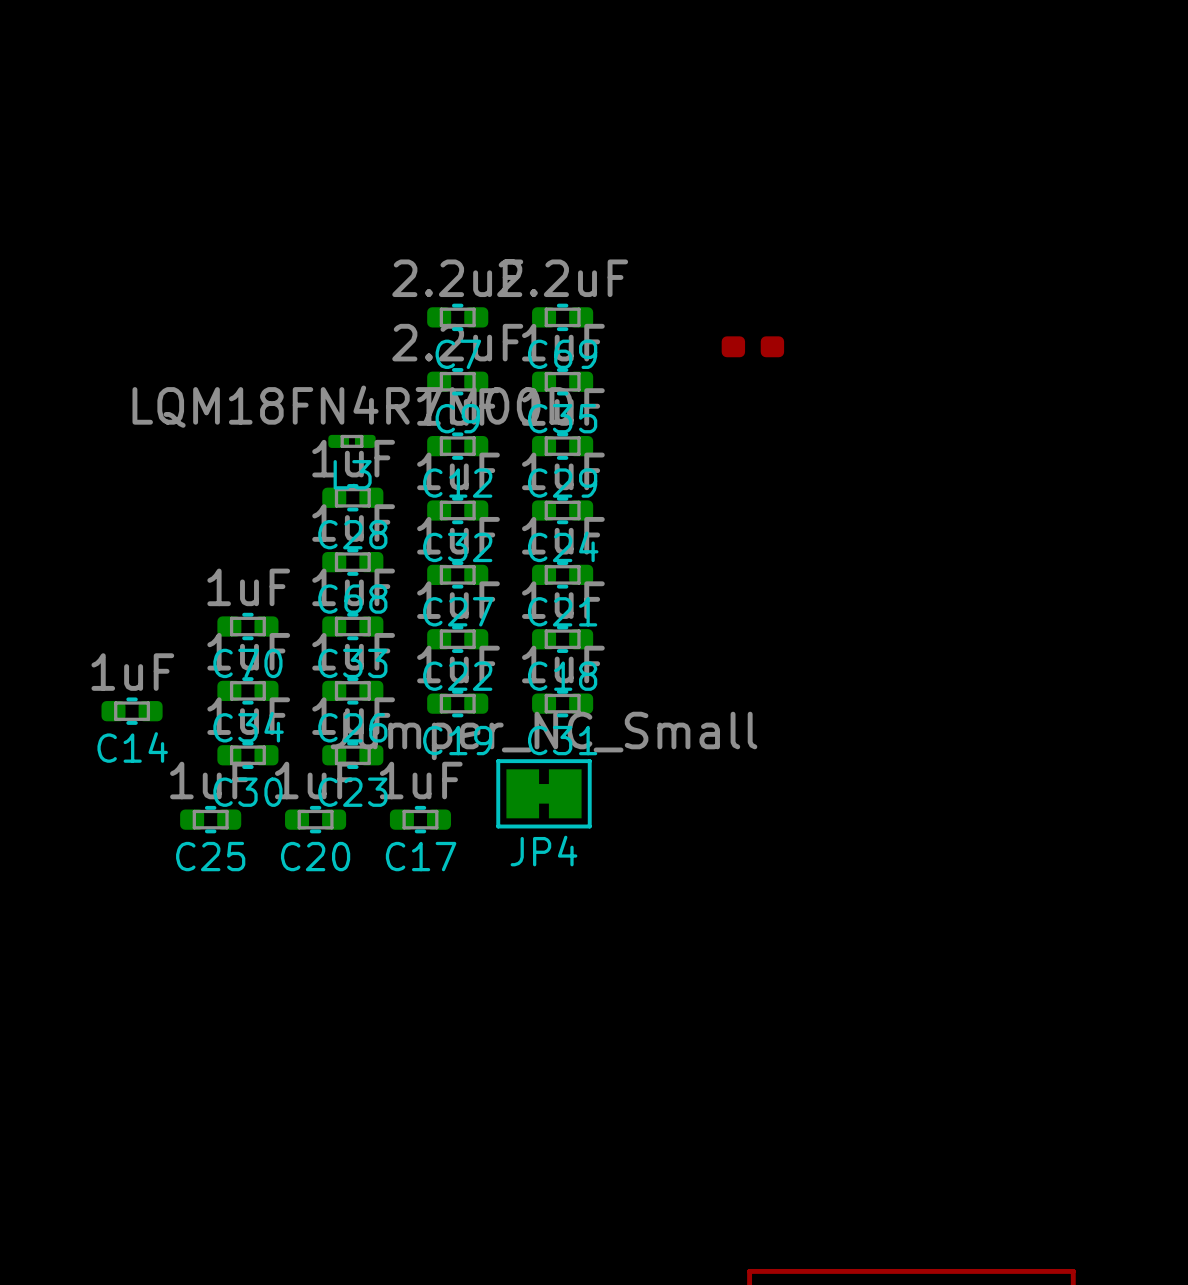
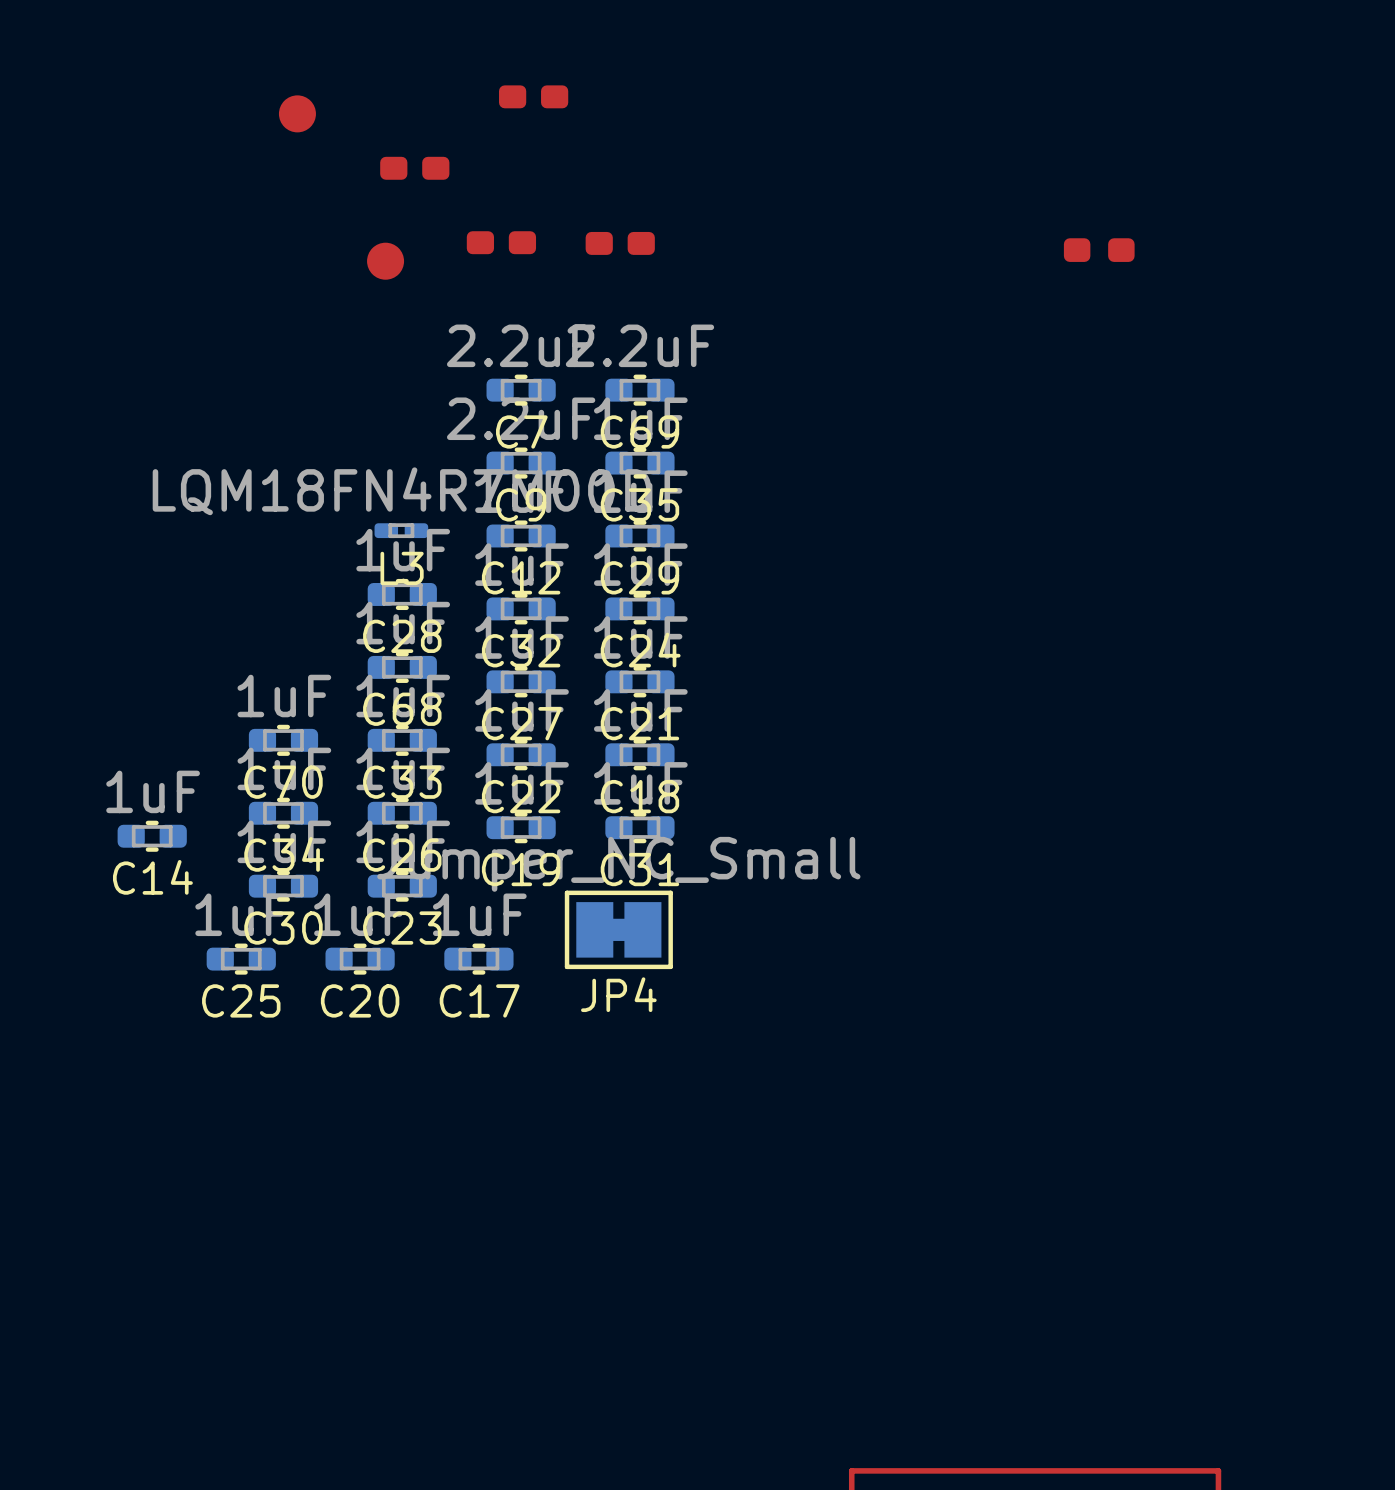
part: none -> (533, 96)
part: none -> (297, 113)
part: none -> (414, 168)
part: none -> (501, 242)
part: none -> (620, 243)
part: none -> (1099, 250)
part: none -> (385, 261)
part: (752, 346) -> none

